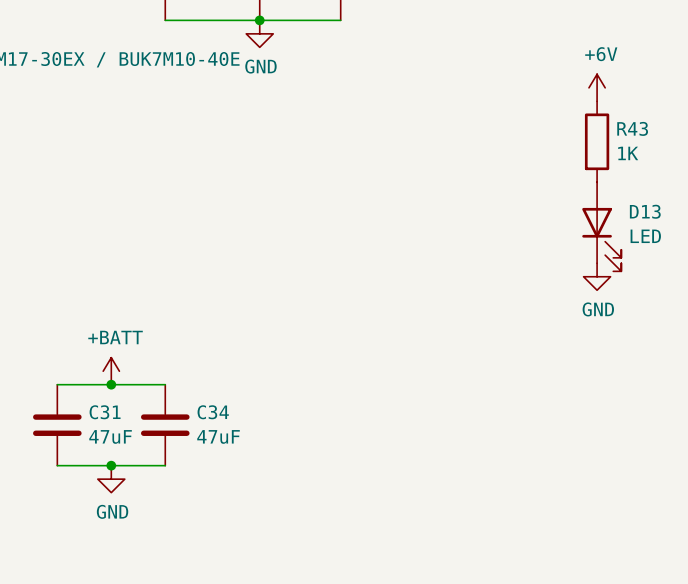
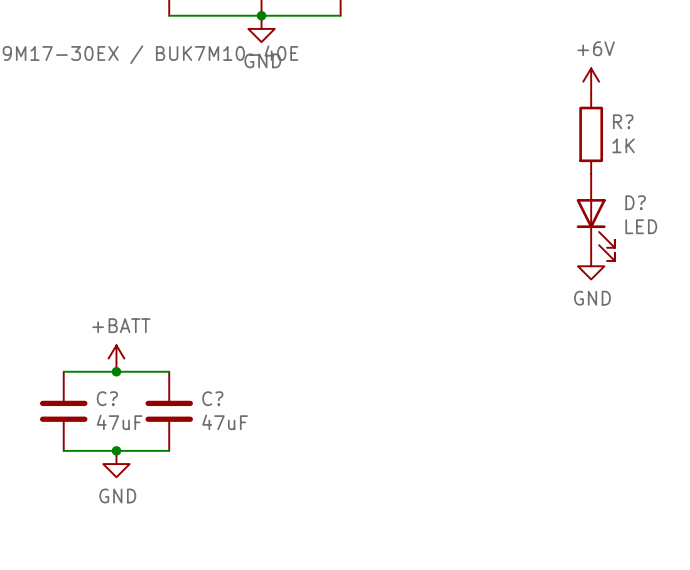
R43 name: R43 (632, 128) -> R? (623, 121)
D13 name: D13 (645, 211) -> D? (635, 202)
C31 name: C31 (105, 412) -> C? (107, 398)
C34 name: C34 (213, 412) -> C? (212, 398)

